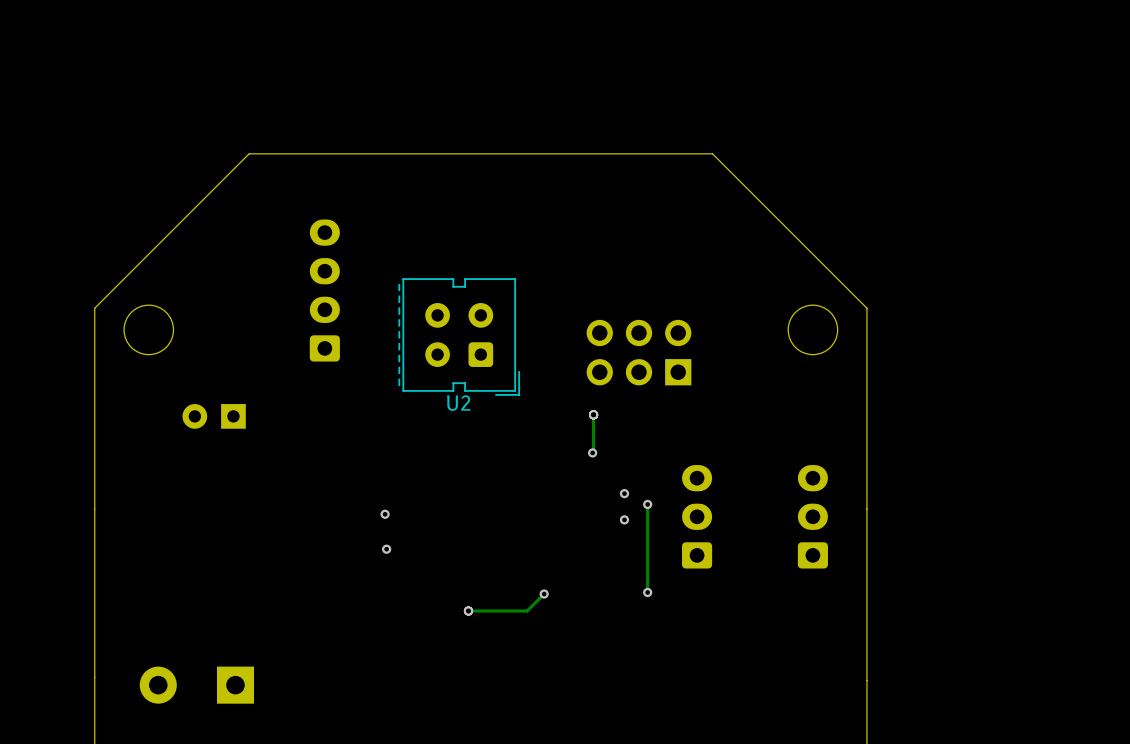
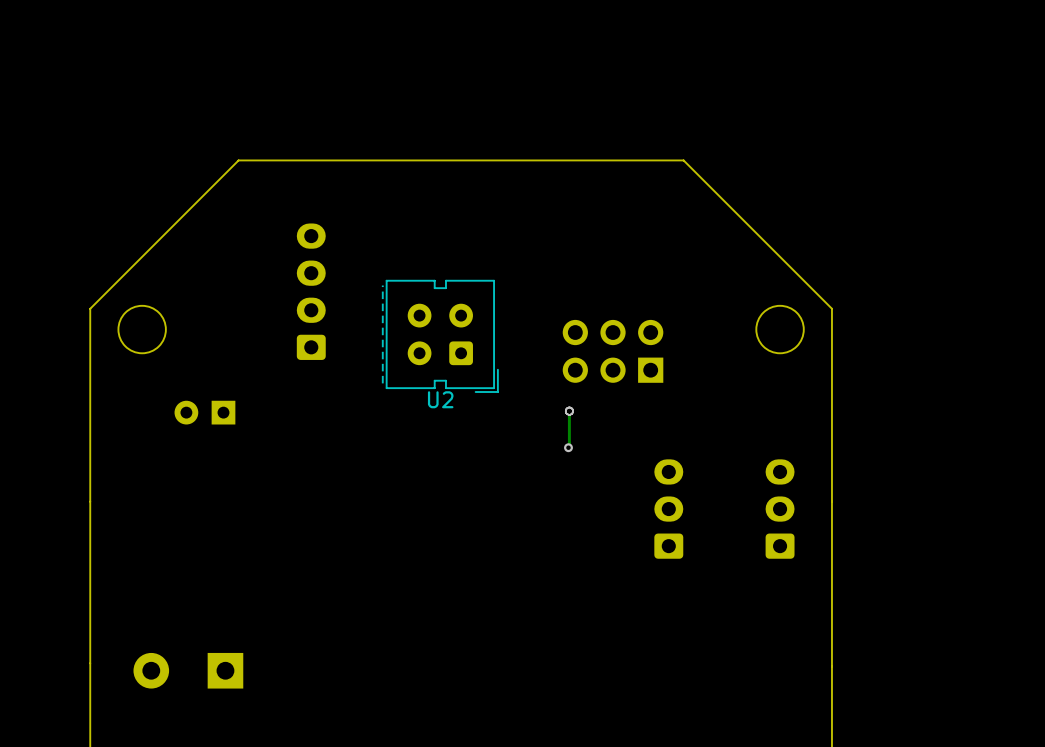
via: (624, 493) -> none
track: (647, 504) (647, 592) -> none
via: (647, 504) -> none
via: (385, 514) -> none
via: (624, 519) -> none
via: (386, 549) -> none
via: (647, 592) -> none
track: (544, 594) (527, 611) (468, 611) -> none
via: (544, 594) -> none
via: (468, 611) -> none

